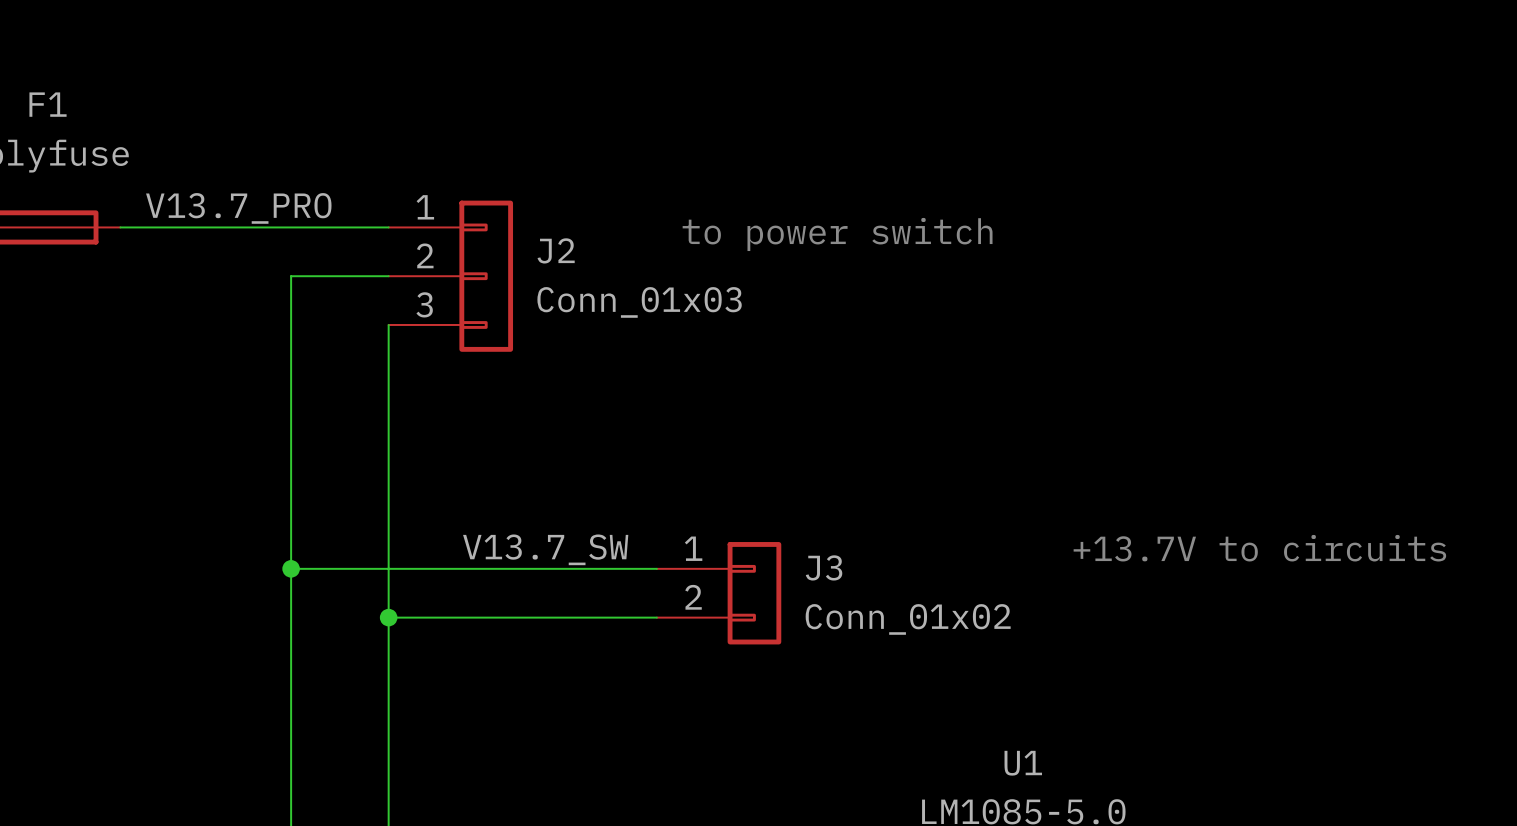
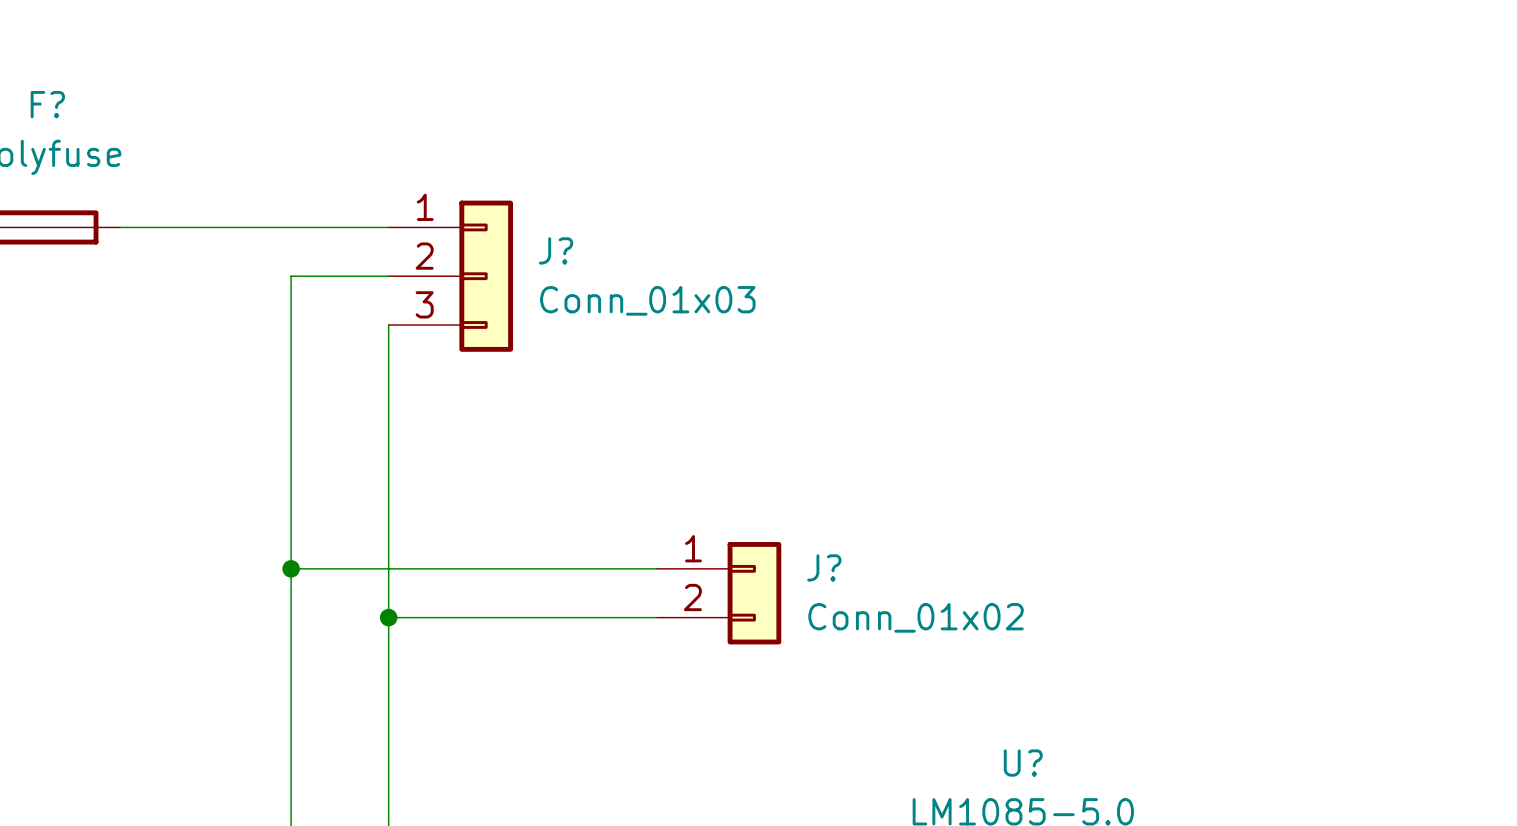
F1 name: F1 (48, 104) -> F? (47, 104)
label: V13.7_PRO (238, 208) -> none
text: to power switch (837, 234) -> none
J2 name: J2 (556, 250) -> J? (556, 250)
text: +13.7V to circuits (1259, 548) -> none
label: V13.7_SW (545, 549) -> none
J3 name: J3 (824, 567) -> J? (824, 567)
U1 name: U1 (1023, 763) -> U? (1023, 763)

